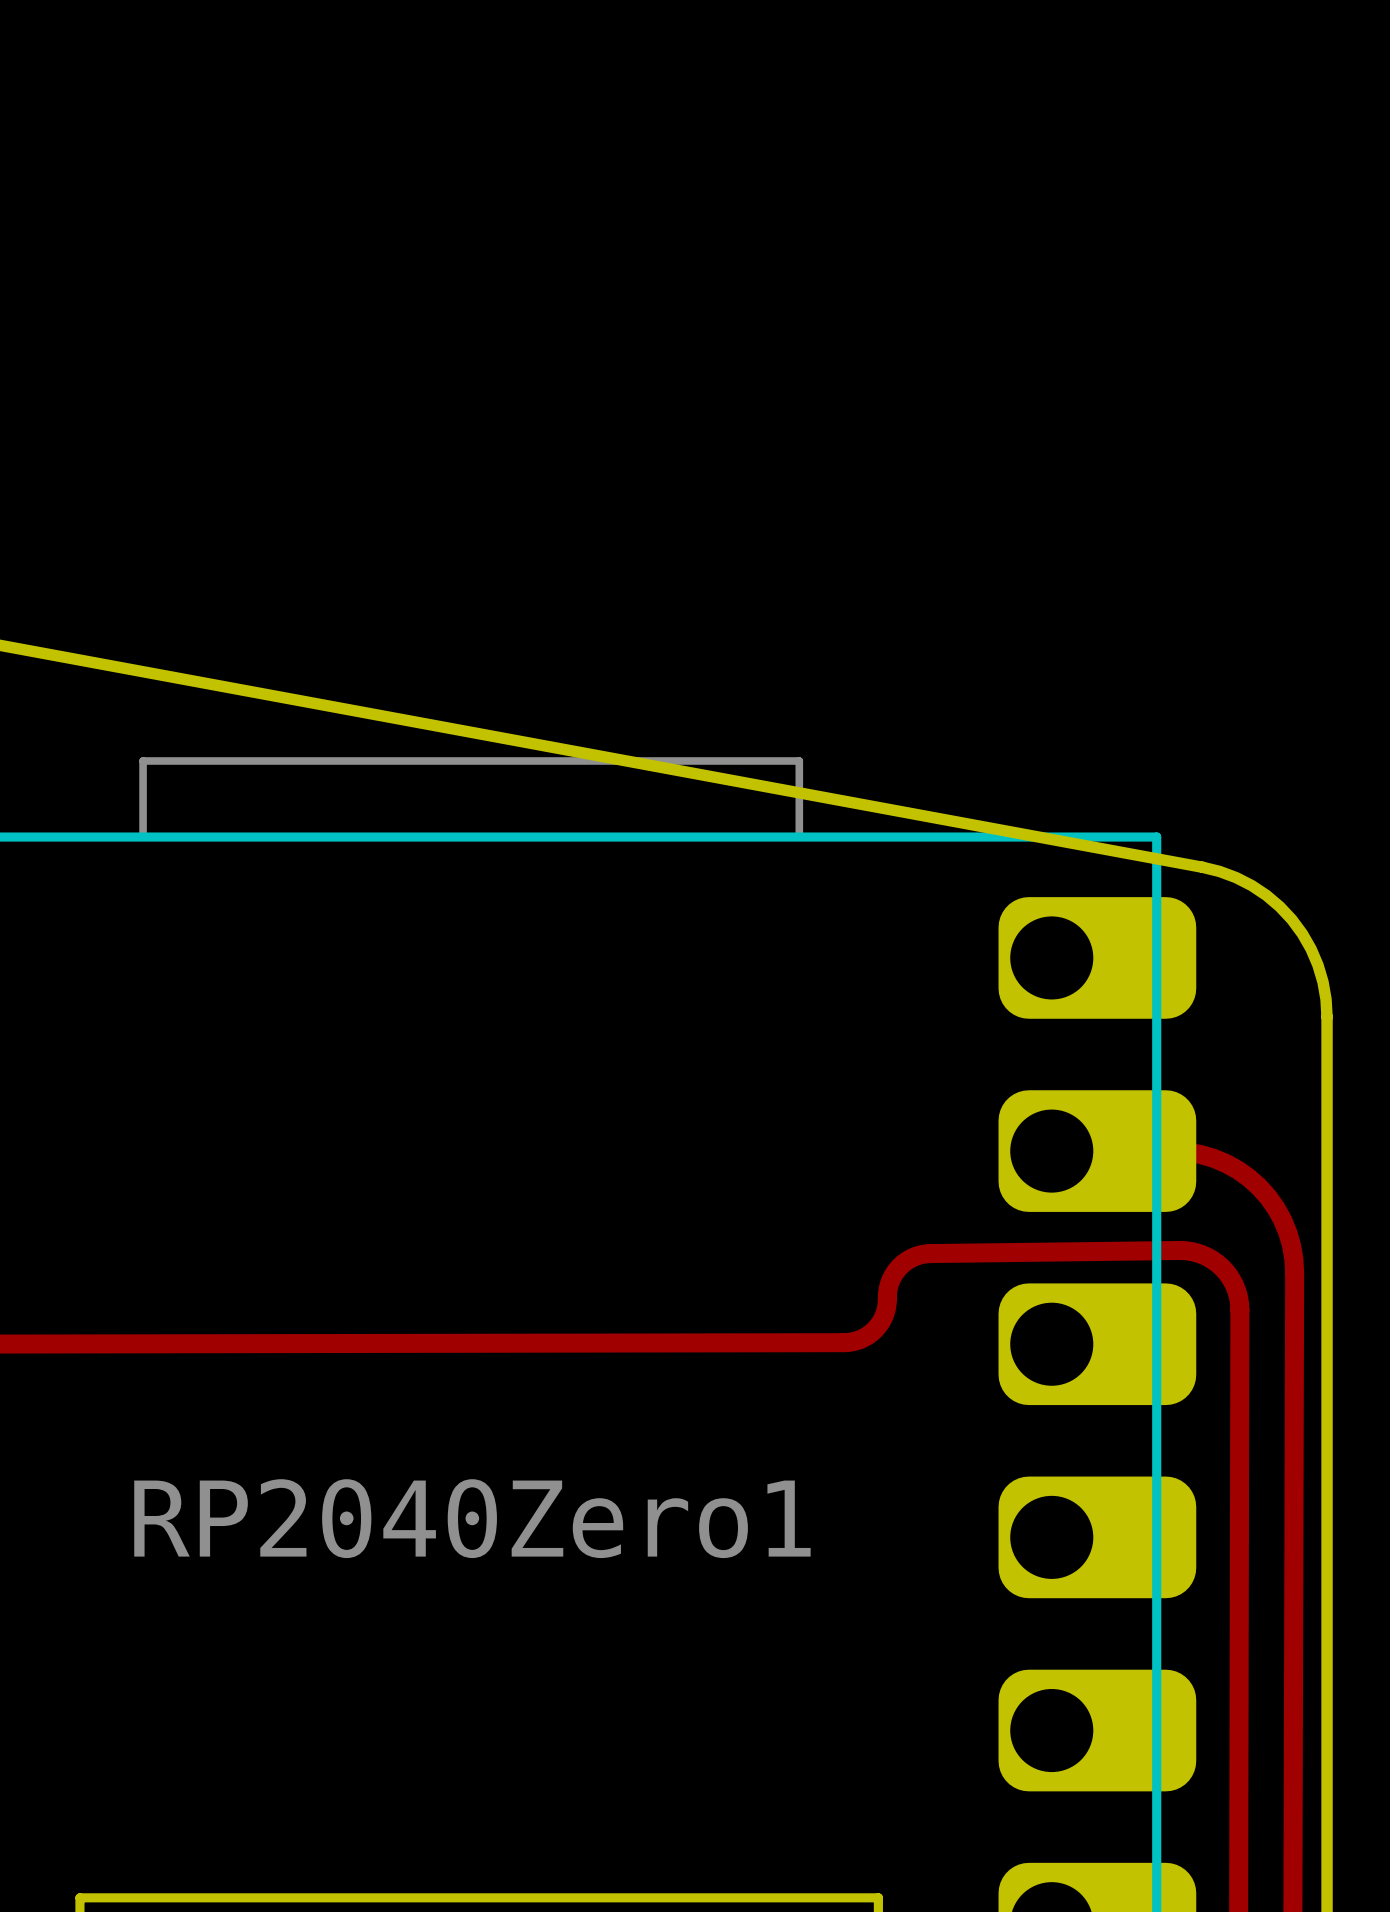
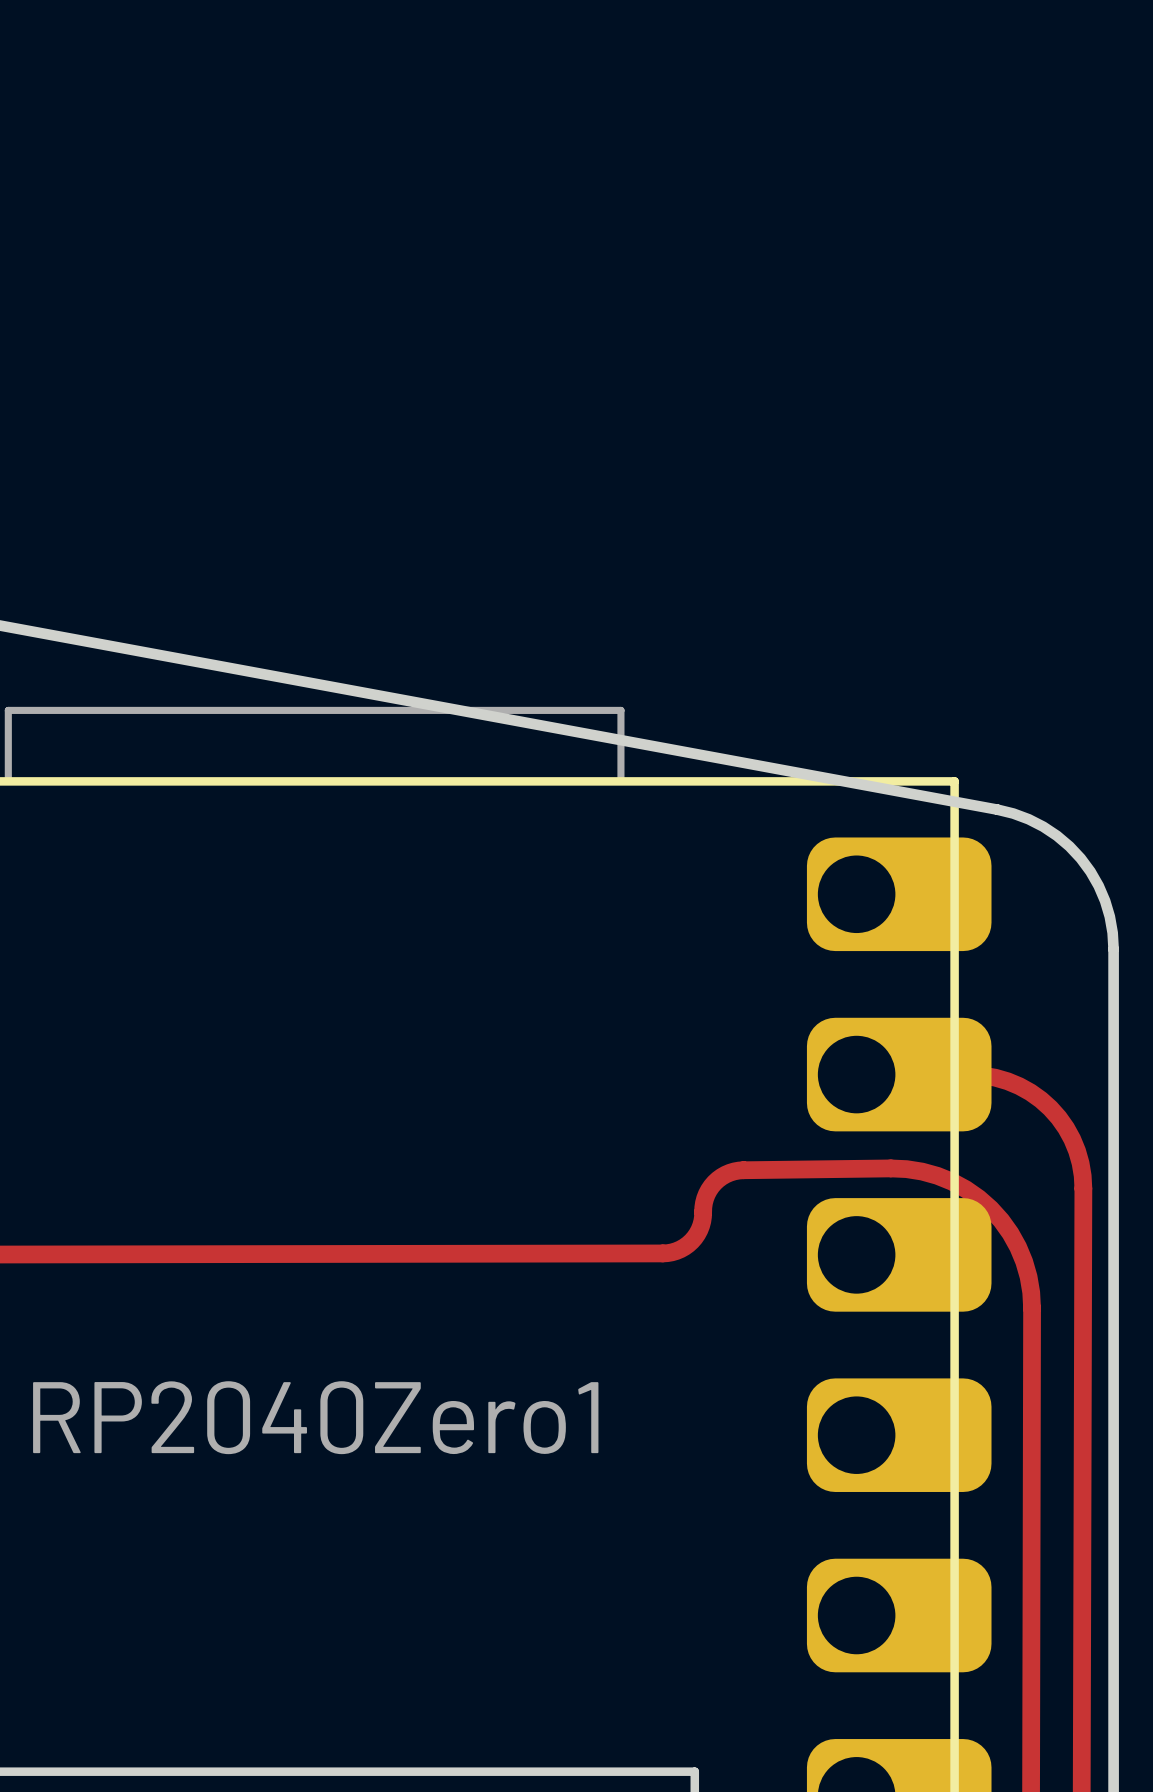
track: (1088, 1251) (1186, 1250) (1205, 1256) (1222, 1267) (1233, 1284) (1239, 1303) (1239, 1401) -> (890, 1168) (922, 1171) (952, 1181) (978, 1198) (990, 1208) (1001, 1220) (1018, 1247) (1028, 1276) (1032, 1308)

